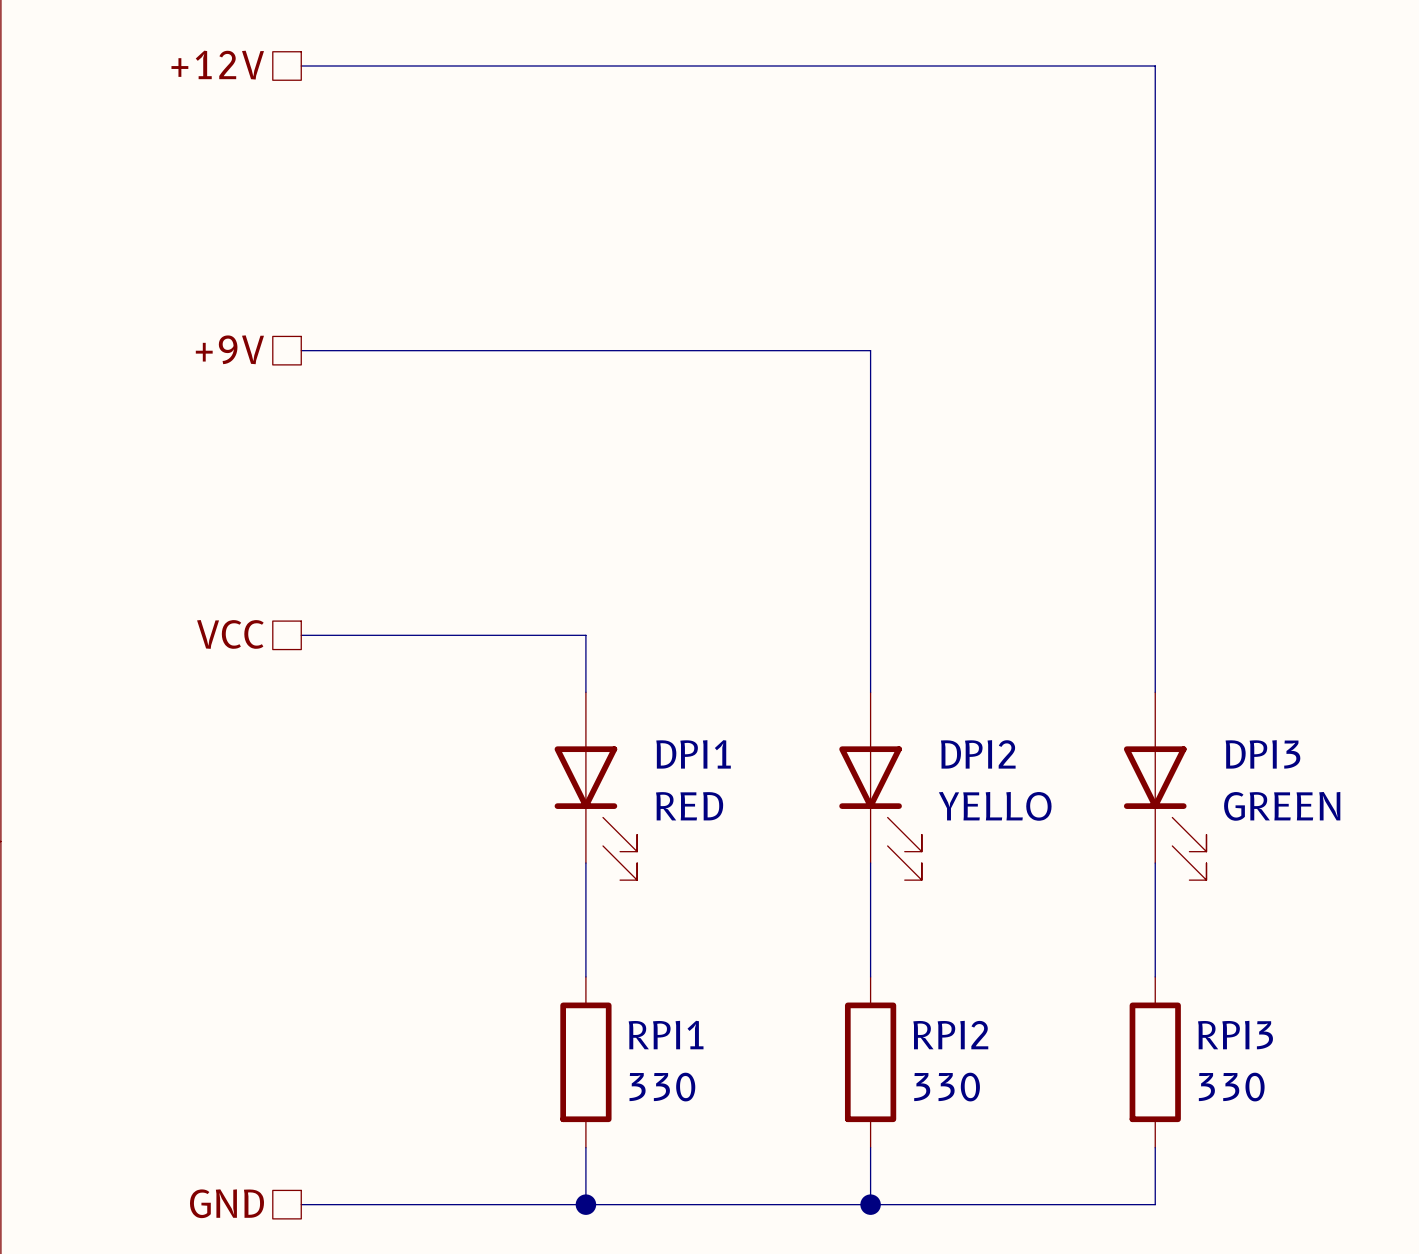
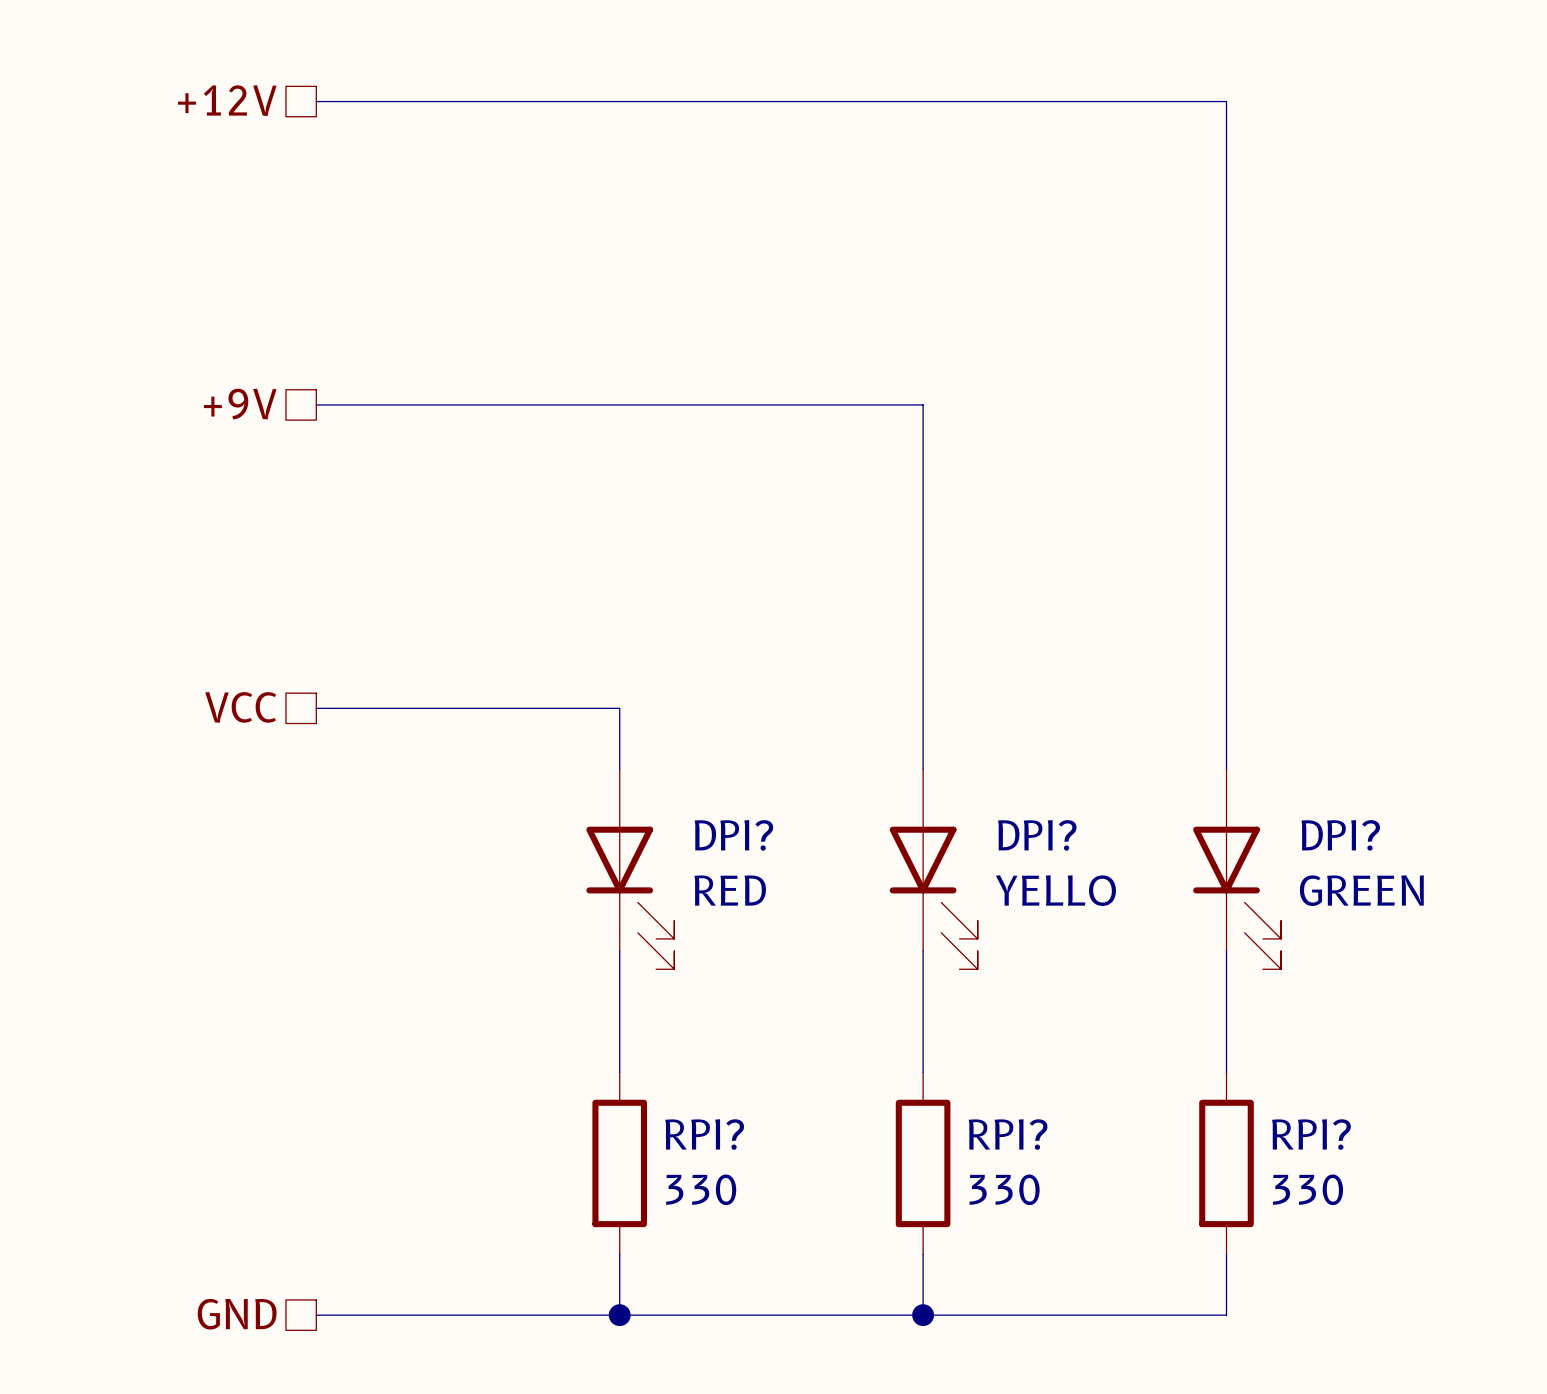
DPI1 name: DPI1 (693, 754) -> DPI? (733, 835)
DPI2 name: DPI2 (978, 754) -> DPI? (1037, 835)
DPI3 name: DPI3 (1262, 754) -> DPI? (1340, 835)
RPI1 name: RPI1 (666, 1035) -> RPI? (704, 1134)
RPI2 name: RPI2 (950, 1035) -> RPI? (1008, 1134)
RPI3 name: RPI3 (1235, 1035) -> RPI? (1311, 1134)

